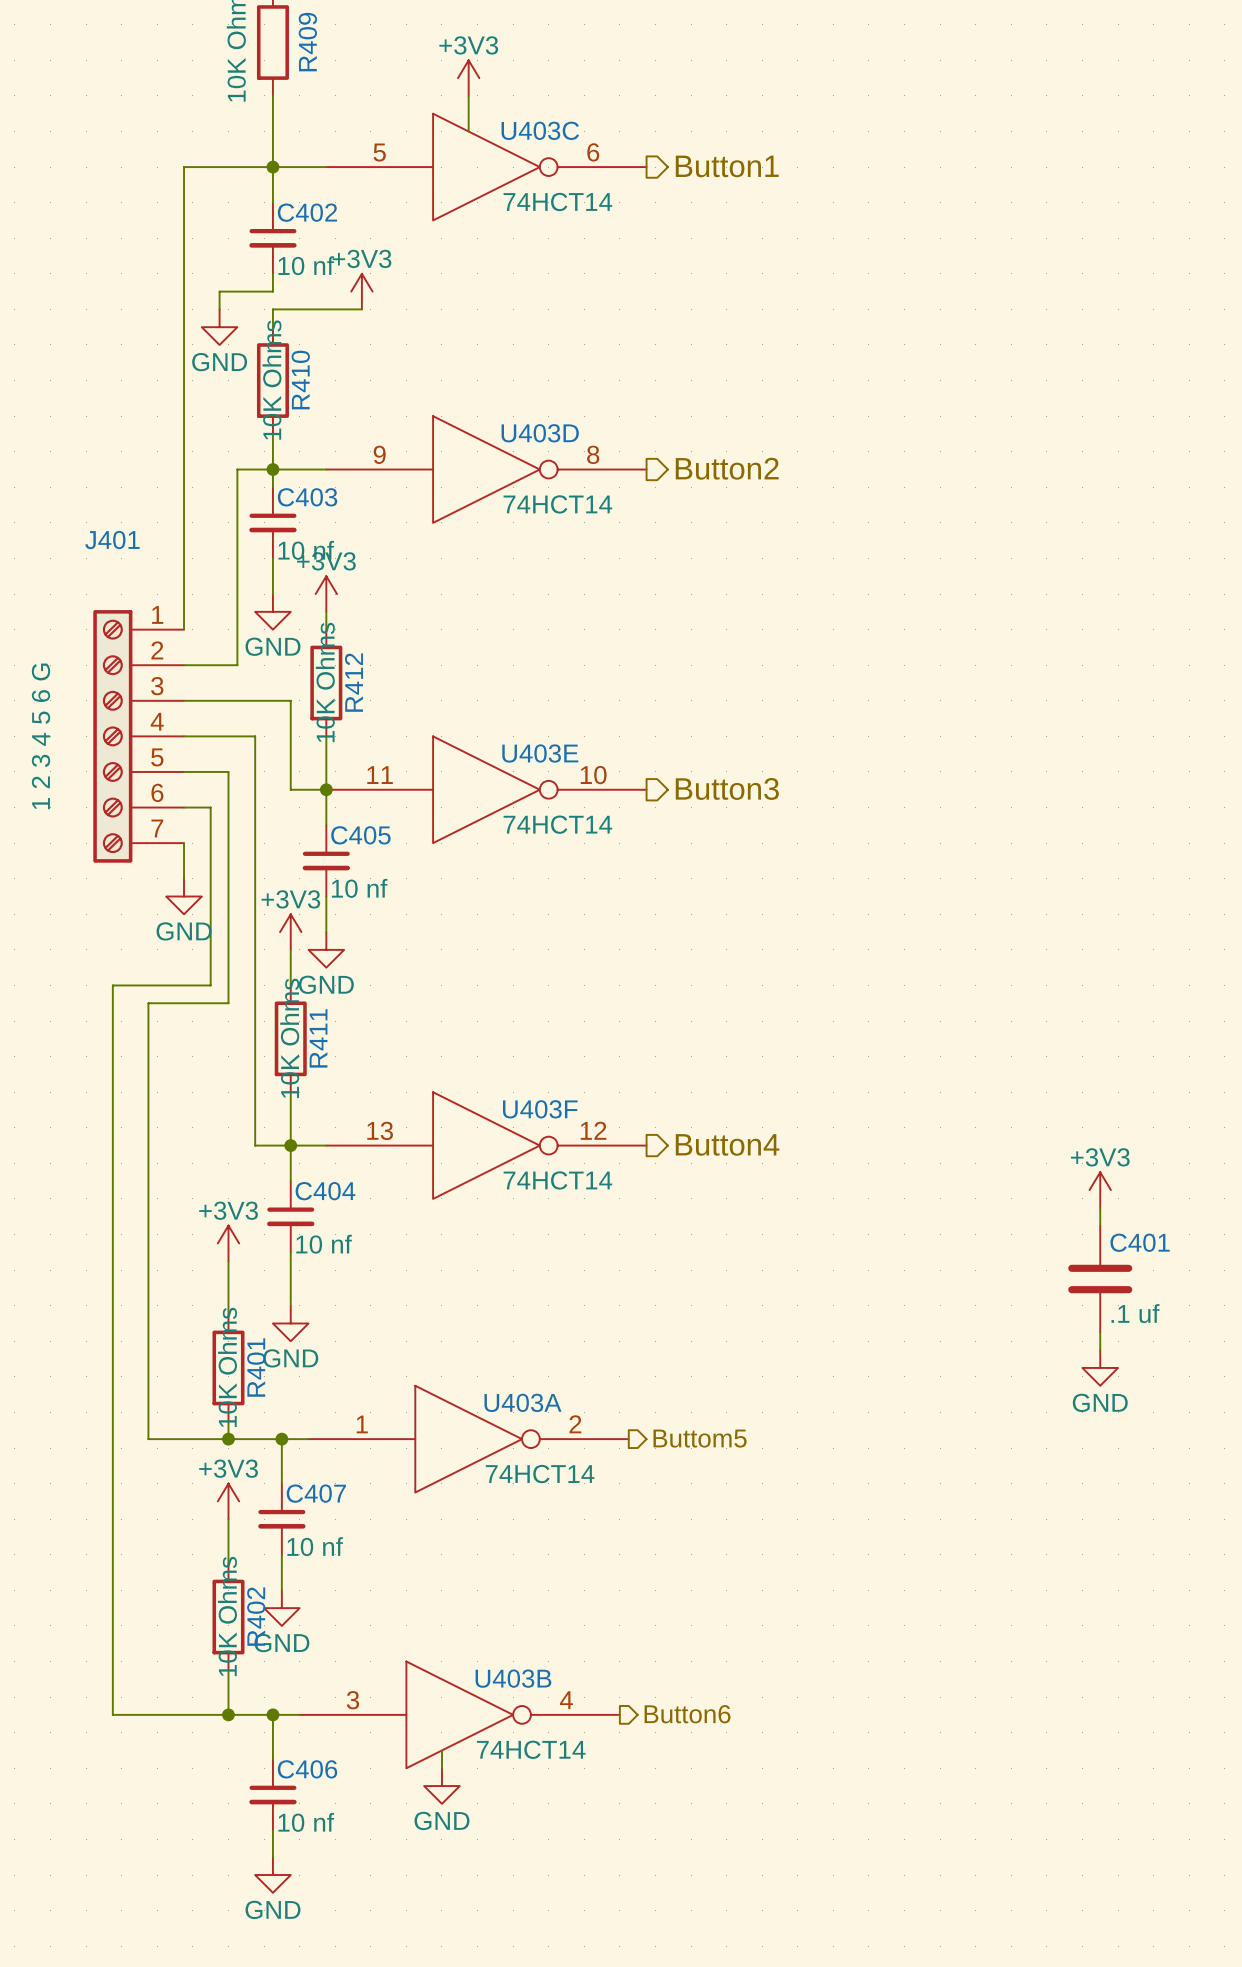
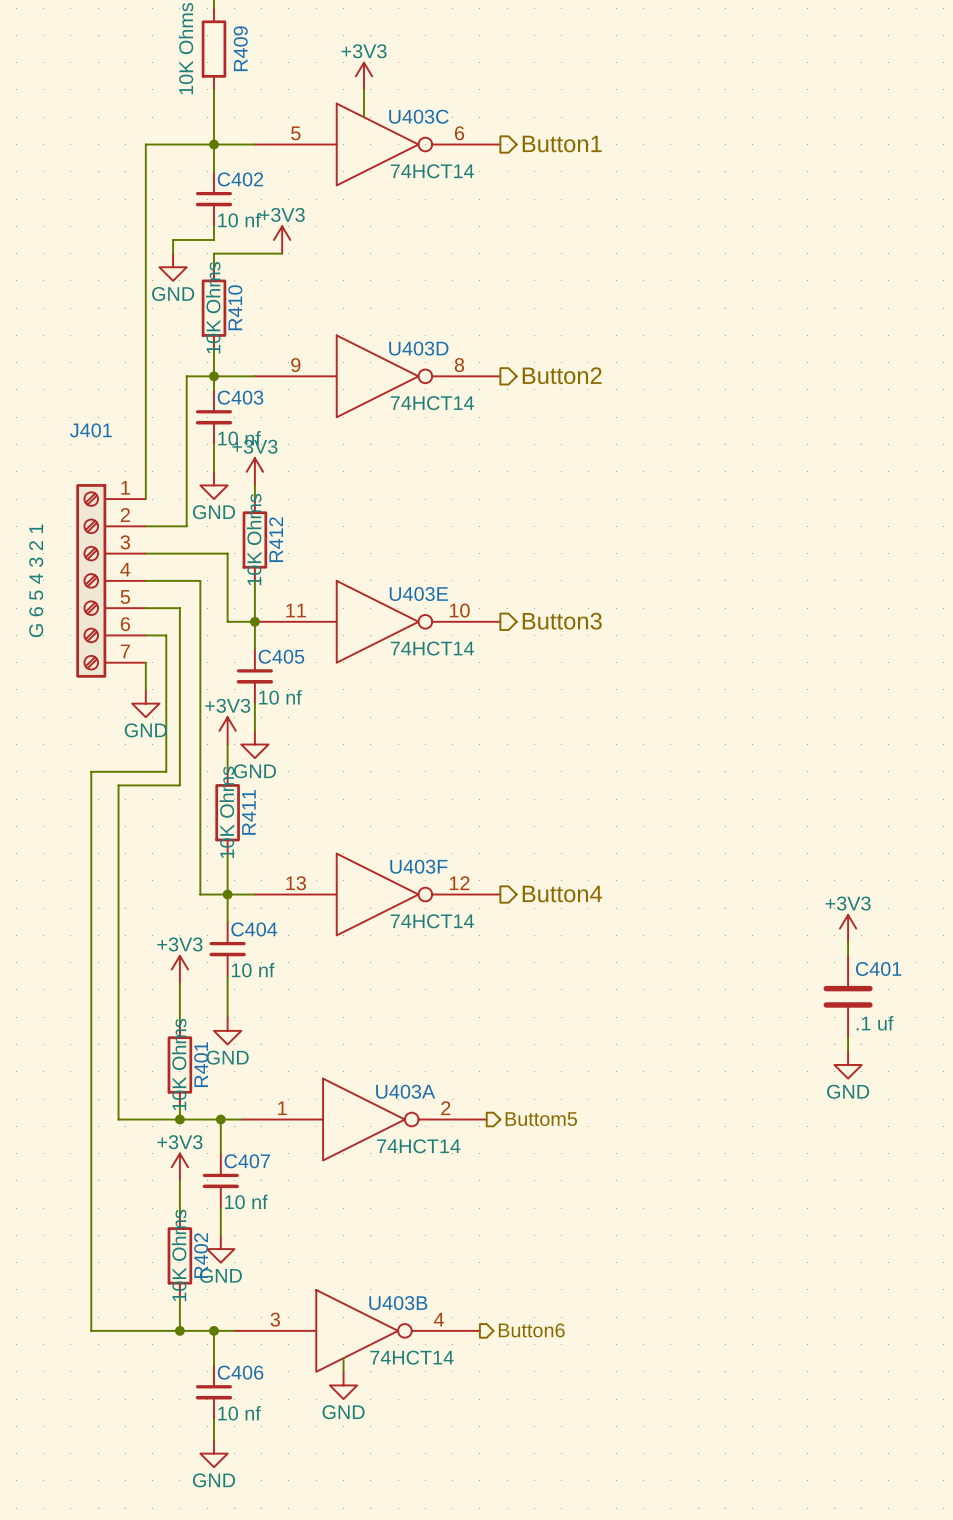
J401 value: 1 2 3 4 5 6 G (41, 736) -> G 6 5 4 3 2 1 (36, 580)

